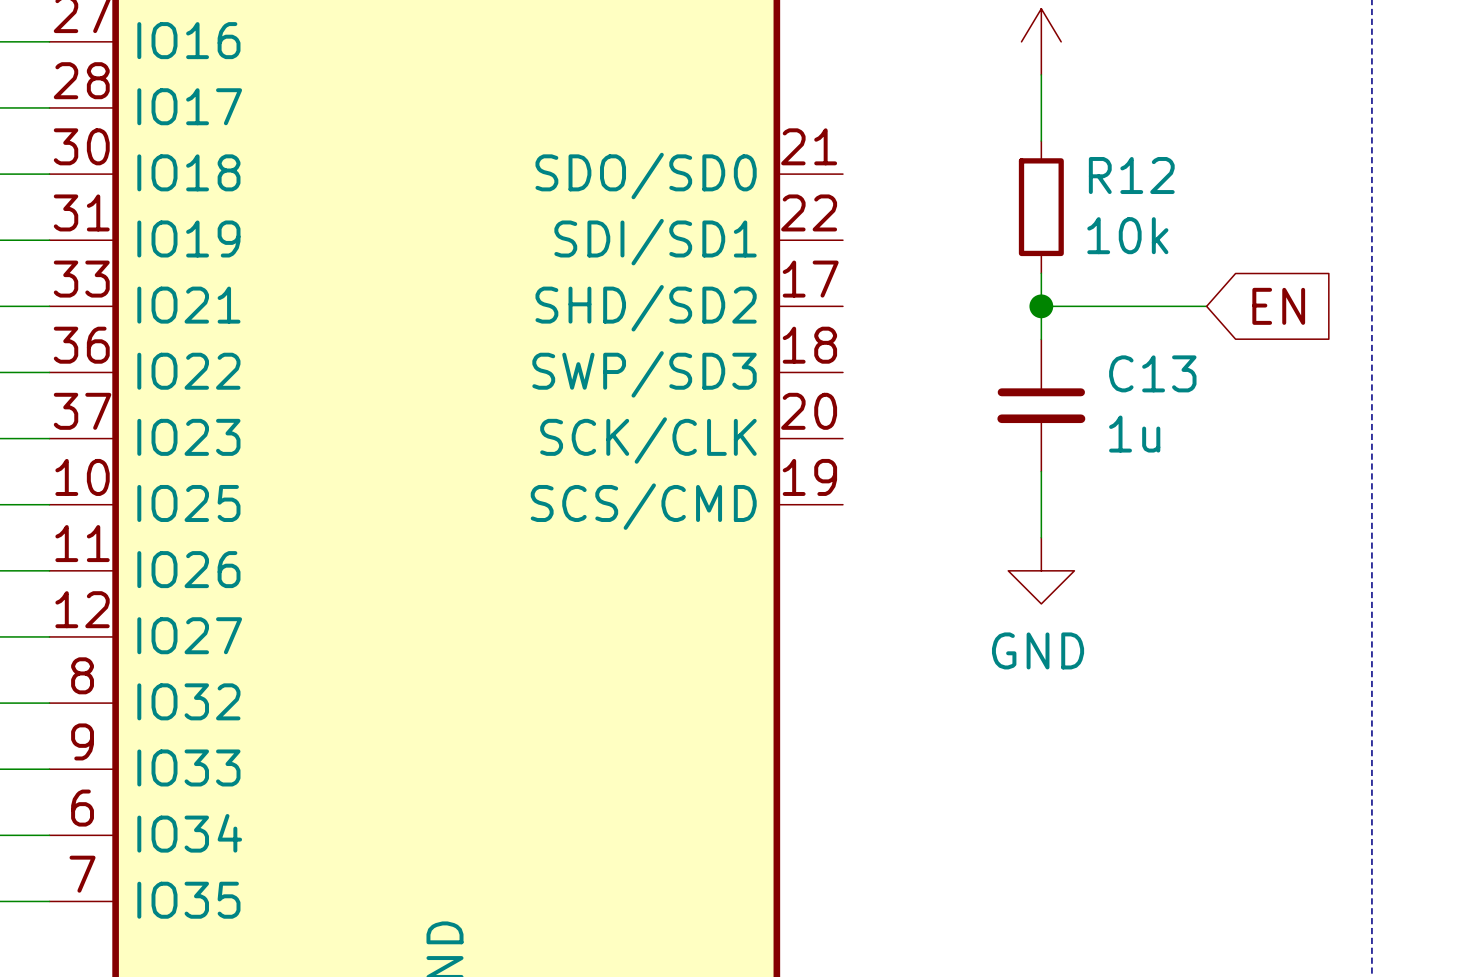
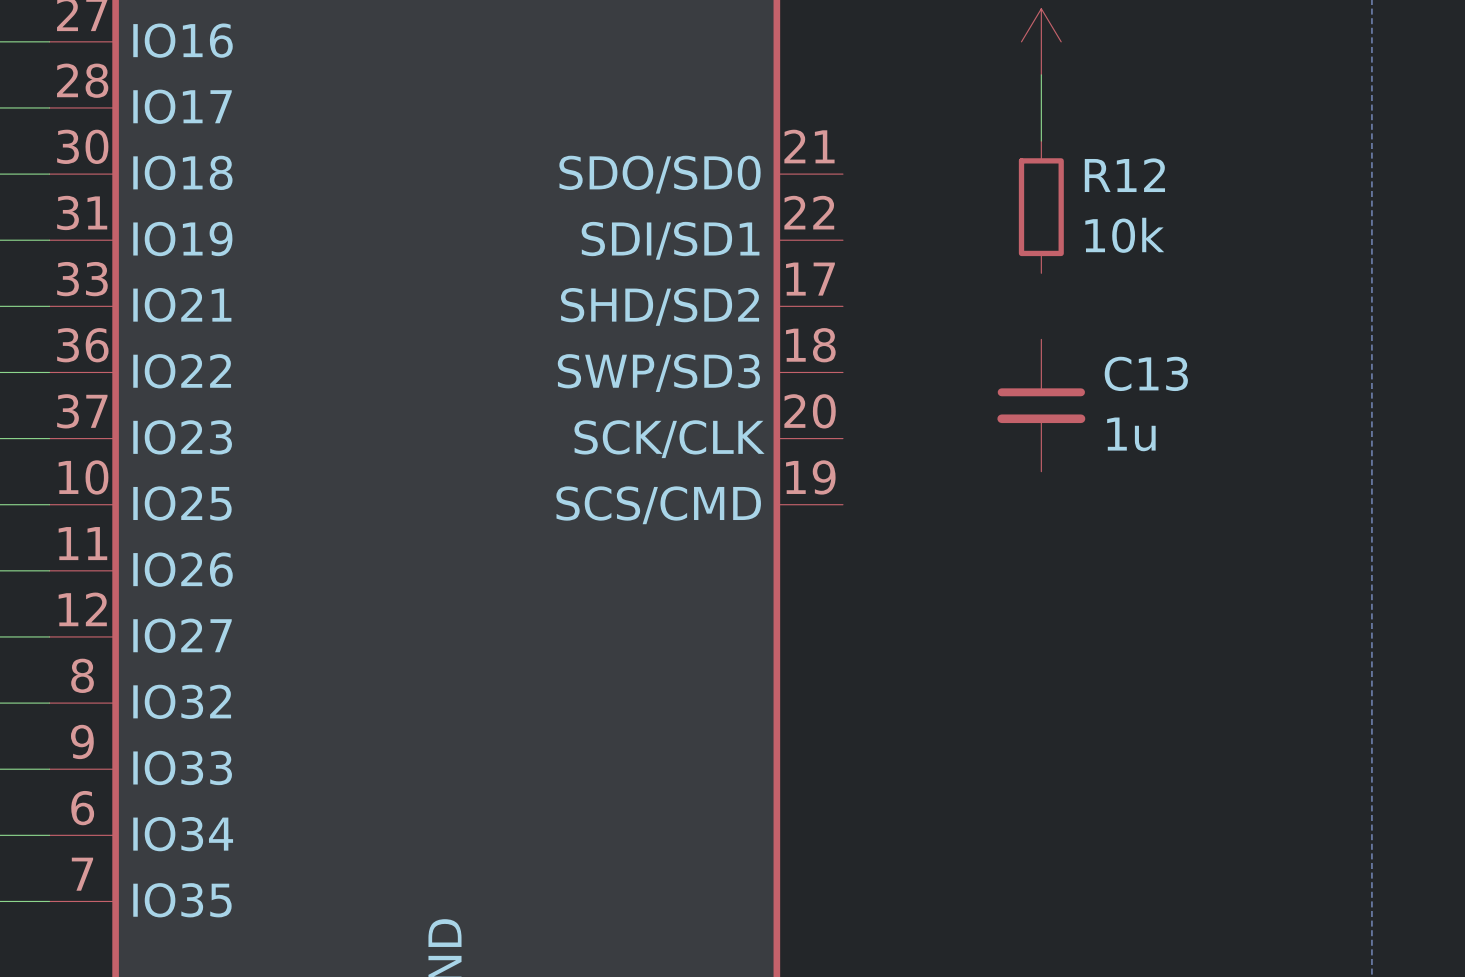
wire: (1041, 273) (1041, 339) -> none
wire: (1041, 306) (1206, 306) -> none
junction: (1041, 306) -> none
global label: EN (1278, 306) -> none
wire: (1041, 471) (1041, 537) -> none
power symbol: GND (1041, 570) -> none

